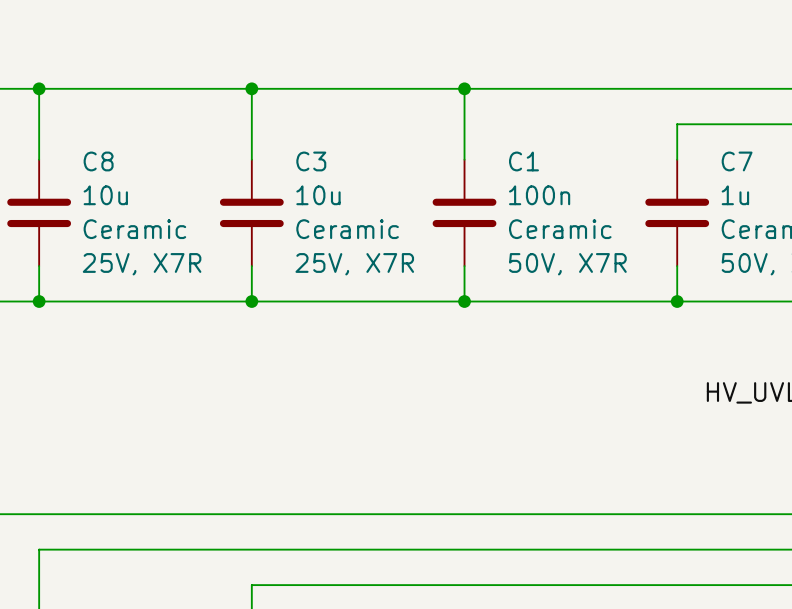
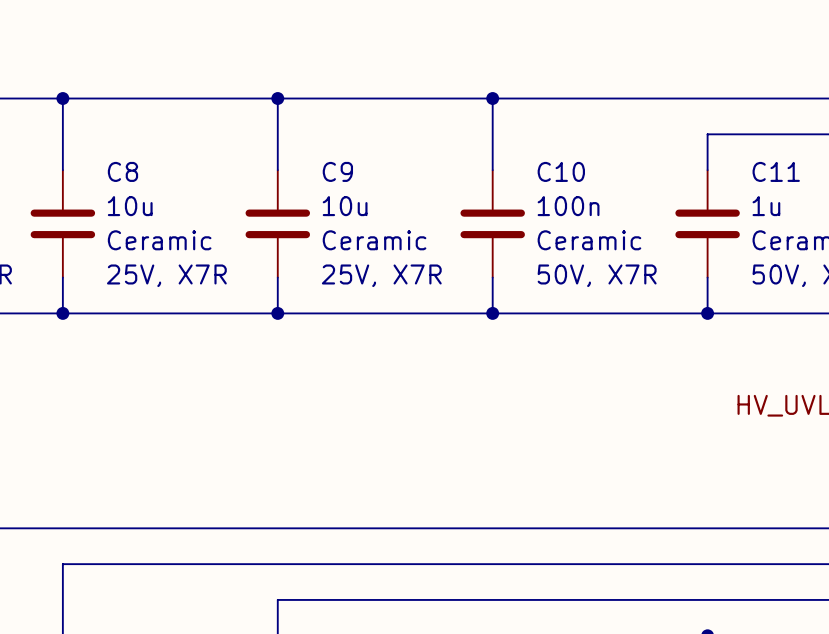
C3 name: C3 (311, 161) -> C9 (337, 171)
C1 name: C1 (523, 161) -> C10 (561, 171)
C7 name: C7 (737, 161) -> C11 (776, 171)

